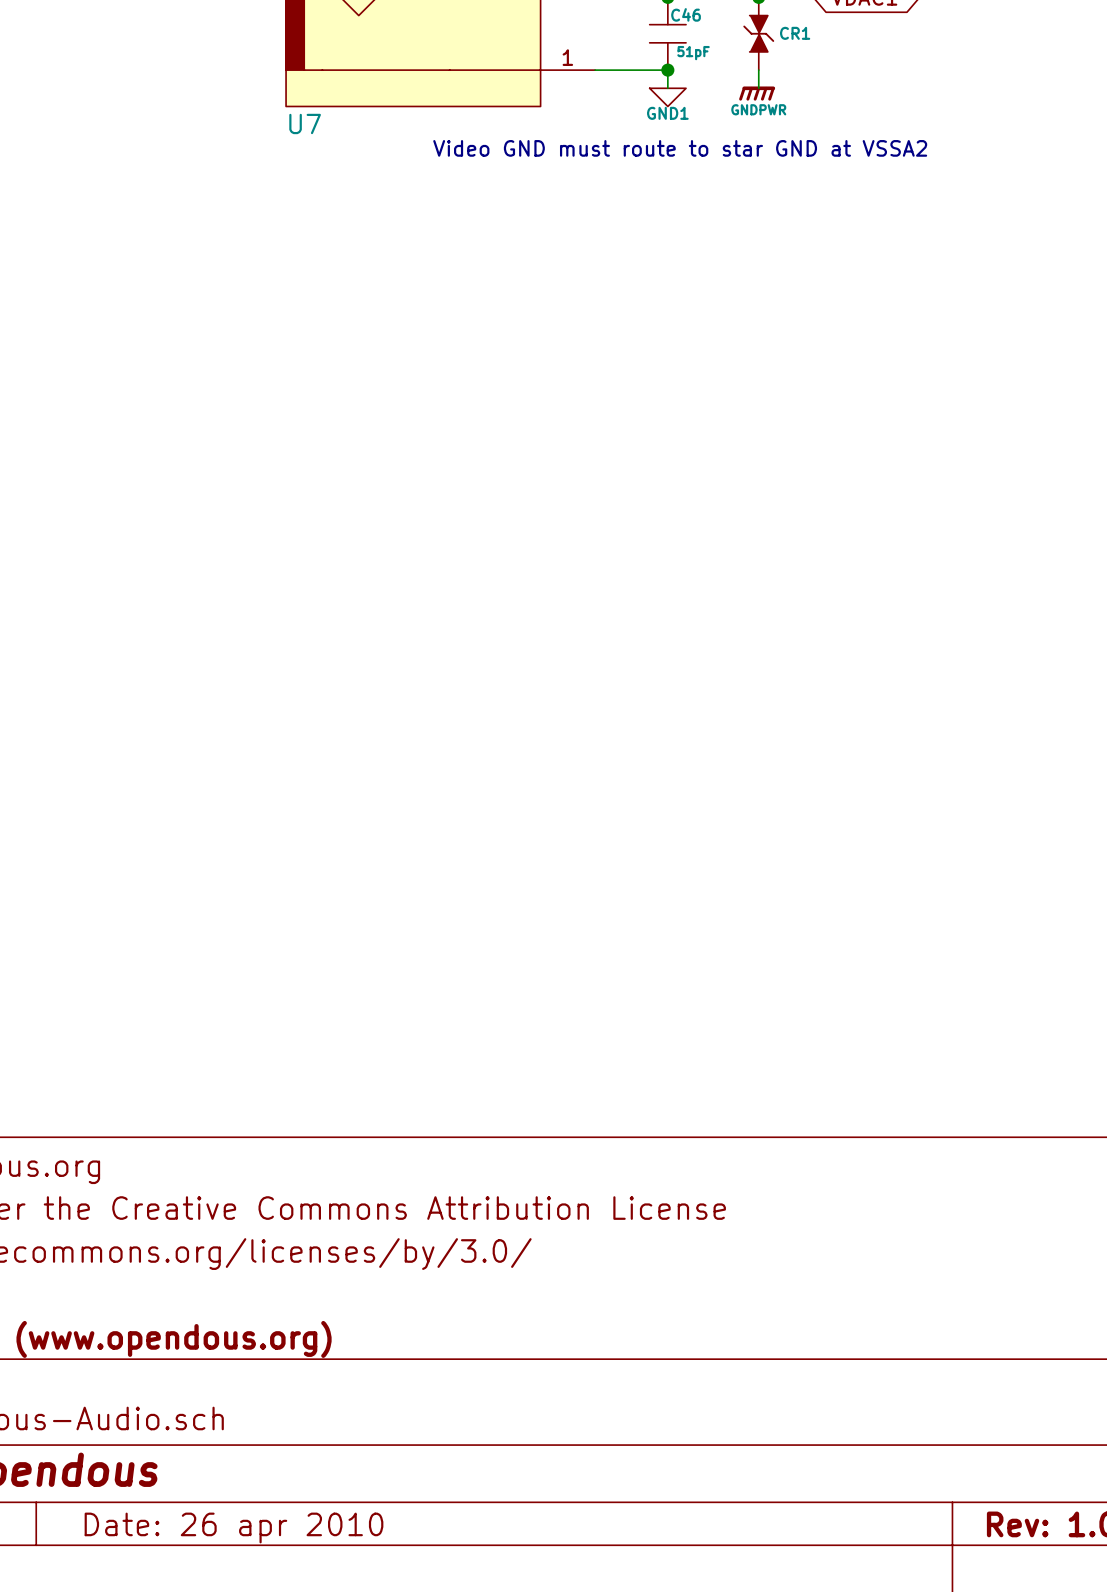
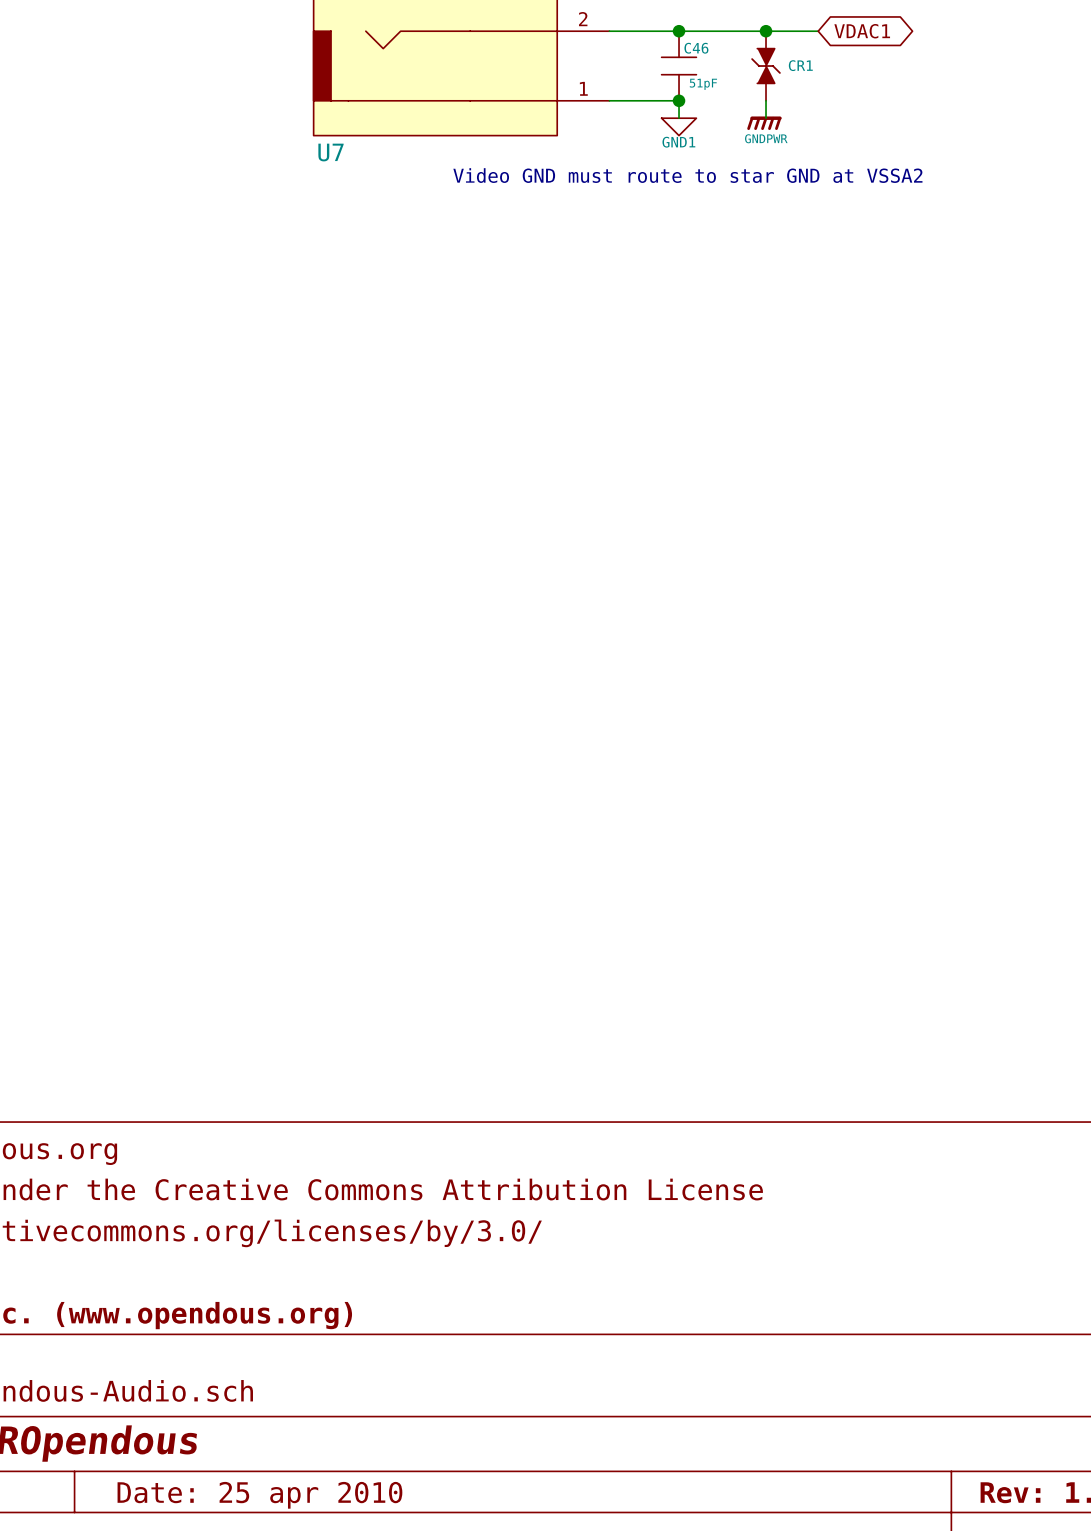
title block: Date: 26 apr 2010 (234, 1528) -> Date: 25 apr 2010 (259, 1495)

